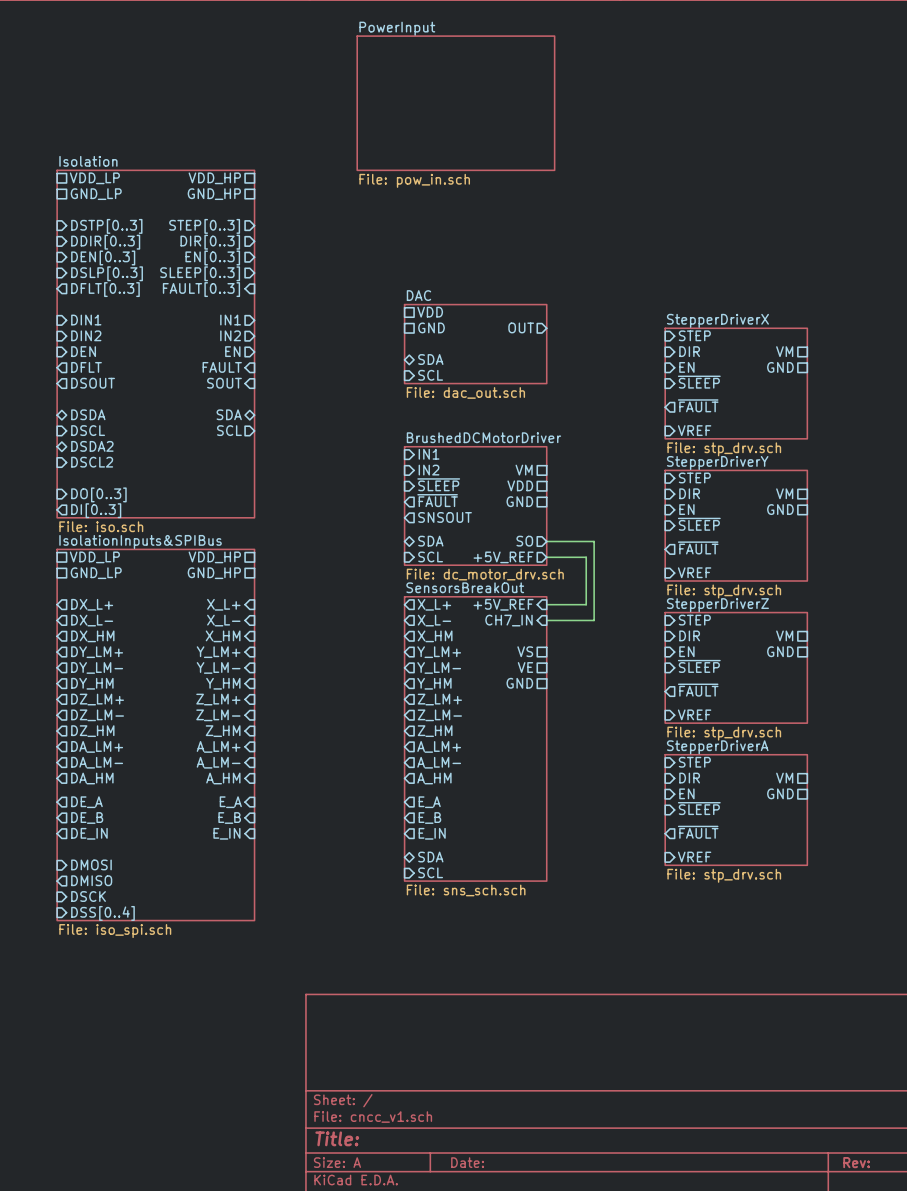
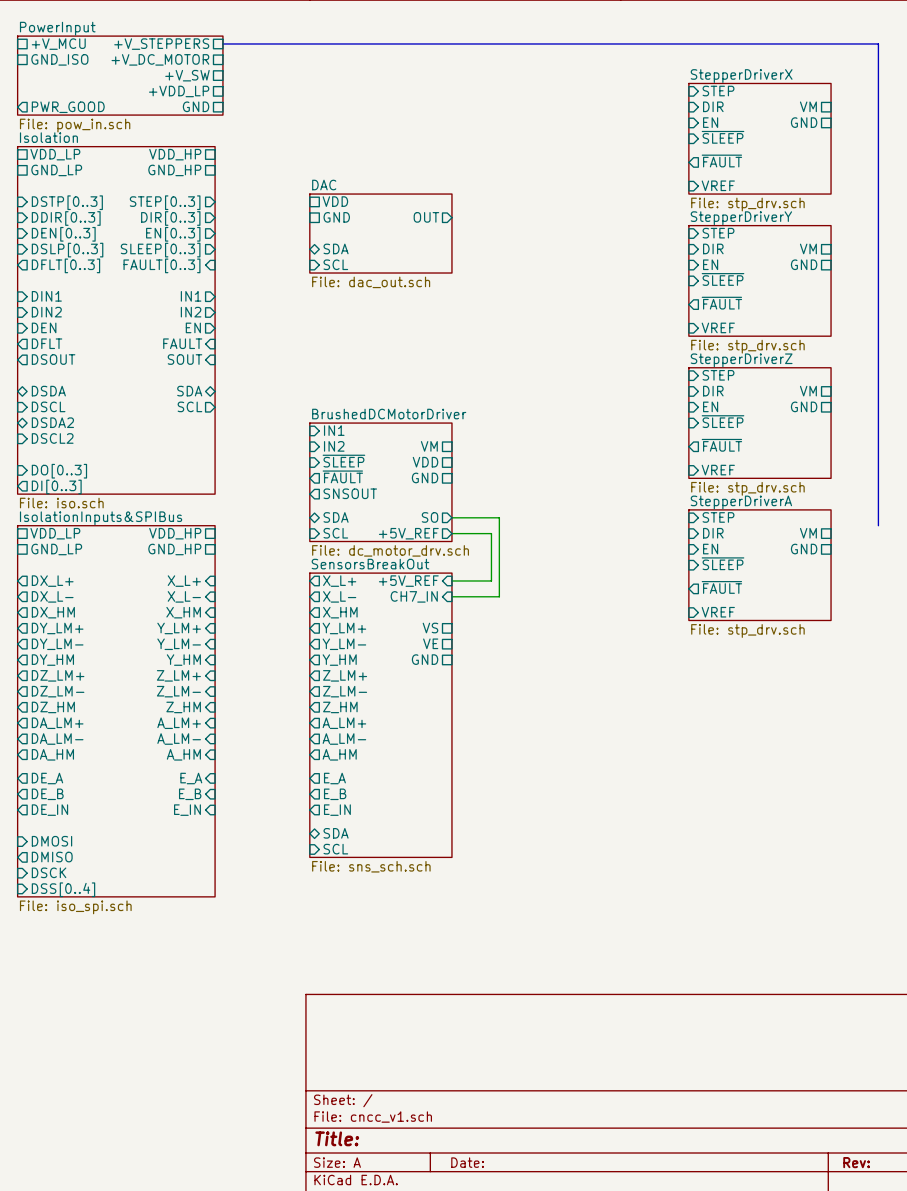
bus: none -> (222, 43) (878, 43) (878, 525)
sheet pin: none -> +V_MCU (58, 44)
sheet pin: none -> +V_STEPPERS (161, 44)
sheet pin: none -> GND_ISO (59, 59)
sheet pin: none -> +V_DC_MOTOR (160, 59)
sheet PowerInput: none -> File: pow_in.sch (120, 75)
sheet pin: none -> +V_SW (187, 75)
sheet pin: none -> +VDD_LP (179, 91)
sheet pin: none -> STEP (718, 91)
sheet PowerInput: File: pow_in.sch (455, 103) -> none
sheet pin: none -> GND (196, 106)
sheet pin: none -> DIR (713, 106)
sheet pin: none -> VM (808, 106)
sheet pin: none -> PWR_GOOD (68, 107)
sheet pin: none -> EN (710, 122)
sheet pin: none -> GND (804, 122)
sheet pin: none -> ~{SLEEP} (723, 137)
sheet StepperDriverX: none -> File: stp_drv.sch (759, 138)
sheet pin: none -> ~{FAULT} (721, 161)
sheet pin position: VDD_LP (94, 178) -> VDD_LP (55, 154)
sheet pin position: VDD_HP (214, 178) -> VDD_HP (175, 154)
sheet pin: none -> VREF (718, 185)
sheet pin position: GND_LP (96, 194) -> GND_LP (56, 170)
sheet pin position: GND_HP (214, 194) -> GND_HP (174, 170)
sheet pin: none -> VDD (335, 201)
sheet pin: none -> GND (336, 217)
sheet pin position: DSTP[0..3] (106, 226) -> DSTP[0..3] (67, 202)
sheet pin position: STEP[0..3] (204, 226) -> STEP[0..3] (165, 202)
sheet pin: none -> STEP (718, 233)
sheet pin position: DDIR[0..3] (105, 242) -> DDIR[0..3] (66, 218)
sheet pin position: DIR[0..3] (210, 242) -> DIR[0..3] (170, 218)
sheet pin: none -> SDA (336, 248)
sheet pin: none -> DIR (713, 248)
sheet pin: none -> VM (808, 248)
sheet pin position: DEN[0..3] (103, 257) -> DEN[0..3] (63, 234)
sheet pin position: EN[0..3] (212, 257) -> EN[0..3] (173, 234)
sheet pin: none -> SCL (335, 264)
sheet pin: none -> EN (710, 264)
sheet pin: none -> GND (804, 264)
sheet pin position: DSLP[0..3] (107, 273) -> DSLP[0..3] (67, 250)
sheet pin position: SLEEP[0..3] (200, 273) -> SLEEP[0..3] (160, 250)
sheet pin: none -> ~{SLEEP} (723, 279)
sheet StepperDriverY: none -> File: stp_drv.sch (759, 280)
sheet pin position: DFLT[0..3] (105, 289) -> DFLT[0..3] (65, 265)
sheet pin position: FAULT[0..3] (201, 289) -> FAULT[0..3] (161, 265)
sheet pin: none -> ~{FAULT} (721, 303)
sheet pin: VDD (430, 312) -> none
sheet pin position: DIN1 (86, 320) -> DIN1 (46, 296)
sheet pin position: IN1 (230, 320) -> IN1 (191, 296)
sheet pin: GND (431, 327) -> none
sheet pin position: OUT (521, 327) -> OUT (426, 217)
sheet pin: none -> VREF (718, 327)
sheet pin position: DIN2 (86, 335) -> DIN2 (46, 312)
sheet pin position: IN2 (230, 335) -> IN2 (191, 312)
sheet pin position: STEP (694, 335) -> STEP (718, 375)
sheet Isolation position: (155, 344) -> (116, 320)
sheet DAC position: (475, 344) -> (380, 233)
sheet pin position: DEN (83, 351) -> DEN (44, 327)
sheet pin position: EN (232, 351) -> EN (193, 327)
sheet pin position: DIR (689, 351) -> DIR (713, 391)
sheet pin position: VM (784, 351) -> VM (808, 391)
sheet pin: SDA (430, 359) -> none
sheet pin position: DFLT (86, 367) -> DFLT (47, 343)
sheet pin position: FAULT (222, 367) -> FAULT (182, 343)
sheet pin position: EN (686, 367) -> EN (710, 406)
sheet pin position: GND (780, 367) -> GND (804, 406)
sheet pin: SCL (430, 375) -> none
sheet pin position: ~{SLEEP} (699, 382) -> ~{SLEEP} (723, 421)
sheet pin position: DSOUT (93, 383) -> DSOUT (53, 359)
sheet pin position: SOUT (224, 383) -> SOUT (184, 359)
sheet StepperDriverX: File: stp_drv.sch (736, 383) -> none
sheet pin position: ~{FAULT} (698, 405) -> ~{FAULT} (721, 445)
sheet pin position: DSDA (88, 414) -> DSDA (48, 391)
sheet pin position: SDA (229, 414) -> SDA (189, 391)
sheet StepperDriverZ: none -> File: stp_drv.sch (759, 423)
sheet pin position: DSCL (88, 430) -> DSCL (48, 406)
sheet pin position: SCL (229, 430) -> SCL (189, 406)
sheet pin: none -> IN1 (334, 430)
sheet pin position: VREF (694, 430) -> VREF (718, 470)
sheet pin position: DSDA2 (92, 446) -> DSDA2 (52, 422)
sheet pin: none -> IN2 (334, 446)
sheet pin: IN1 (429, 454) -> none
sheet pin position: DSCL2 (92, 462) -> DSCL2 (52, 438)
sheet pin: none -> VDD (425, 462)
sheet pin: IN2 (429, 470) -> none
sheet pin position: VM (524, 470) -> VM (429, 446)
sheet pin: none -> GND (425, 477)
sheet pin position: STEP (694, 477) -> STEP (718, 517)
sheet pin position: ~{SLEEP} (438, 484) -> ~{SLEEP} (343, 461)
sheet pin: VDD (520, 485) -> none
sheet pin position: DIR (689, 493) -> DIR (713, 533)
sheet pin position: VM (784, 493) -> VM (808, 533)
sheet pin position: DO[0..3] (98, 494) -> DO[0..3] (59, 471)
sheet pin position: ~{FAULT} (437, 500) -> ~{FAULT} (342, 476)
sheet pin: GND (519, 501) -> none
sheet BrushedDCMotorDriver position: (475, 505) -> (380, 482)
sheet pin position: EN (686, 509) -> EN (710, 549)
sheet pin position: GND (780, 509) -> GND (804, 549)
sheet pin position: DI[0..3] (96, 510) -> DI[0..3] (56, 487)
sheet pin: none -> SDA (336, 517)
sheet pin position: SNSOUT (445, 517) -> SNSOUT (350, 493)
sheet pin position: ~{SLEEP} (699, 524) -> ~{SLEEP} (723, 563)
sheet StepperDriverY: File: stp_drv.sch (736, 525) -> none
sheet pin: none -> SCL (335, 533)
sheet pin: none -> +5V_REF (408, 533)
sheet pin: SDA (430, 541) -> none
sheet pin position: SO (524, 541) -> SO (430, 517)
wire: (546, 541) (594, 541) (594, 620) (546, 620) -> (451, 517) (499, 517) (499, 596) (451, 596)
sheet pin position: ~{FAULT} (698, 547) -> ~{FAULT} (721, 587)
sheet pin: SCL (430, 556) -> none
sheet pin position: VDD_LP (94, 557) -> VDD_LP (55, 533)
sheet pin position: VDD_HP (214, 557) -> VDD_HP (175, 533)
sheet pin: +5V_REF (503, 557) -> none
wire: (546, 557) (586, 557) (586, 604) (546, 604) -> (451, 533) (491, 533) (491, 580) (451, 580)
sheet StepperDriverA: none -> File: stp_drv.sch (759, 565)
sheet pin position: VREF (694, 572) -> VREF (718, 612)
sheet pin position: GND_LP (96, 573) -> GND_LP (56, 549)
sheet pin position: GND_HP (214, 573) -> GND_HP (174, 549)
sheet pin: none -> X_L+ (184, 581)
sheet pin: none -> X_L+ (339, 581)
sheet pin: none -> +5V_REF (408, 581)
sheet pin: none -> X_L- (339, 596)
sheet pin position: DX_L+ (92, 604) -> DX_L+ (52, 581)
sheet pin: X_L+ (223, 604) -> X_L- (184, 596)
sheet pin: X_L+ (434, 604) -> none
sheet pin: +5V_REF (503, 604) -> none
sheet pin: none -> X_HM (183, 612)
sheet pin: none -> X_HM (340, 612)
sheet pin position: DX_L- (92, 620) -> DX_L- (52, 596)
sheet pin: X_L- (223, 620) -> none
sheet pin: X_L- (434, 620) -> none
sheet pin position: CH7_IN (508, 620) -> CH7_IN (414, 596)
sheet pin: STEP (694, 620) -> none
sheet pin: none -> Y_LM+ (179, 628)
sheet pin: none -> Y_LM+ (344, 628)
sheet pin: DIR (689, 635) -> none
sheet pin: VM (784, 635) -> none
sheet pin position: DX_HM (92, 636) -> DX_HM (53, 612)
sheet pin: X_HM (223, 636) -> none
sheet pin: X_HM (435, 636) -> none
sheet pin: none -> Y_LM- (179, 644)
sheet pin: none -> Y_LM- (344, 644)
sheet pin position: VS (525, 651) -> VS (430, 628)
sheet pin: EN (686, 651) -> none
sheet pin: GND (780, 651) -> none
sheet pin position: DY_LM+ (97, 652) -> DY_LM+ (57, 628)
sheet pin: Y_LM+ (218, 652) -> none
sheet pin: Y_LM+ (439, 652) -> none
sheet pin: none -> GND (425, 659)
sheet pin: none -> Y_HM (183, 660)
sheet pin: none -> Y_HM (339, 660)
sheet pin: ~{SLEEP} (699, 666) -> none
sheet pin position: DY_LM- (97, 667) -> DY_LM- (57, 644)
sheet pin: Y_LM- (218, 667) -> none
sheet pin: Y_LM- (439, 667) -> none
sheet pin position: VE (525, 667) -> VE (430, 643)
sheet StepperDriverZ: File: stp_drv.sch (736, 667) -> none
sheet pin: none -> Z_LM+ (178, 675)
sheet pin: none -> Z_LM+ (345, 675)
sheet pin position: DY_HM (92, 683) -> DY_HM (52, 660)
sheet pin: Y_HM (223, 683) -> none
sheet pin: Y_HM (434, 683) -> none
sheet pin: GND (519, 683) -> none
sheet pin: ~{FAULT} (698, 690) -> none
sheet pin: none -> Z_LM- (178, 691)
sheet pin: none -> Z_LM- (345, 691)
sheet pin position: DZ_LM+ (97, 699) -> DZ_LM+ (58, 675)
sheet pin: Z_LM+ (218, 699) -> none
sheet pin: Z_LM+ (439, 699) -> none
sheet pin: none -> Z_HM (183, 707)
sheet pin: none -> Z_HM (340, 707)
sheet pin: VREF (694, 714) -> none
sheet pin position: DZ_LM- (97, 715) -> DZ_LM- (58, 691)
sheet pin: Z_LM- (218, 715) -> none
sheet pin: Z_LM- (439, 715) -> none
sheet pin: none -> A_LM+ (179, 723)
sheet pin: none -> A_LM+ (344, 723)
sheet pin position: DZ_HM (92, 731) -> DZ_HM (53, 707)
sheet pin: Z_HM (223, 731) -> none
sheet pin: Z_HM (435, 731) -> none
sheet IsolationInputs&SPIBus position: (155, 734) -> (116, 711)
sheet SensorsBreakOut position: (475, 738) -> (380, 715)
sheet pin: none -> A_LM- (179, 739)
sheet pin: none -> A_LM- (344, 739)
sheet pin position: DA_LM+ (97, 746) -> DA_LM+ (57, 723)
sheet pin: A_LM+ (218, 746) -> none
sheet pin: A_LM+ (439, 746) -> none
sheet pin: none -> A_HM (183, 754)
sheet pin: none -> A_HM (339, 754)
sheet pin position: DA_LM- (97, 762) -> DA_LM- (57, 739)
sheet pin: A_LM- (218, 762) -> none
sheet pin: A_LM- (439, 762) -> none
sheet pin: STEP (694, 762) -> none
sheet pin position: DA_HM (92, 778) -> DA_HM (52, 754)
sheet pin: none -> E_A (191, 778)
sheet pin: A_HM (223, 778) -> none
sheet pin: none -> E_A (334, 778)
sheet pin: A_HM (434, 778) -> none
sheet pin: DIR (689, 778) -> none
sheet pin: VM (784, 778) -> none
sheet pin: EN (686, 793) -> none
sheet pin: GND (780, 793) -> none
sheet pin: none -> E_B (190, 794)
sheet pin: none -> E_B (335, 794)
sheet pin position: DE_A (86, 802) -> DE_A (47, 778)
sheet pin: E_A (230, 802) -> none
sheet pin: E_A (429, 802) -> none
sheet pin: ~{SLEEP} (699, 808) -> none
sheet pin: none -> E_IN (187, 810)
sheet pin: none -> E_IN (337, 810)
sheet StepperDriverA: File: stp_drv.sch (736, 810) -> none
sheet pin position: DE_B (87, 818) -> DE_B (47, 794)
sheet pin: E_B (229, 818) -> none
sheet pin: E_B (429, 818) -> none
sheet pin: ~{FAULT} (698, 832) -> none
sheet pin position: DE_IN (89, 833) -> DE_IN (49, 810)
sheet pin: E_IN (226, 833) -> none
sheet pin: E_IN (432, 833) -> none
sheet pin position: SDA (430, 857) -> SDA (336, 833)
sheet pin: VREF (694, 857) -> none
sheet pin position: DMOSI (91, 864) -> DMOSI (51, 841)
sheet pin position: SCL (430, 872) -> SCL (335, 849)
sheet pin position: DMISO (91, 880) -> DMISO (52, 857)
sheet pin position: DSCK (88, 896) -> DSCK (49, 872)
sheet pin position: DSS[0..4] (102, 913) -> DSS[0..4] (63, 889)

